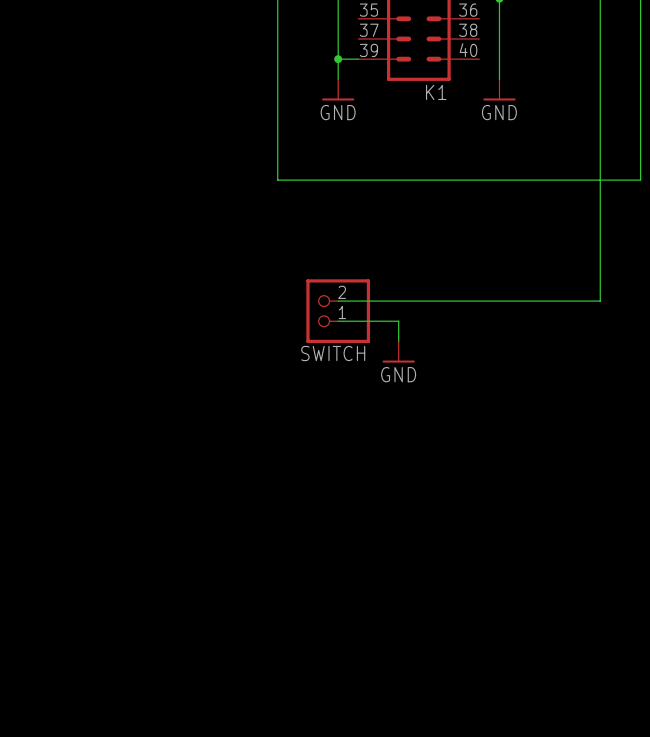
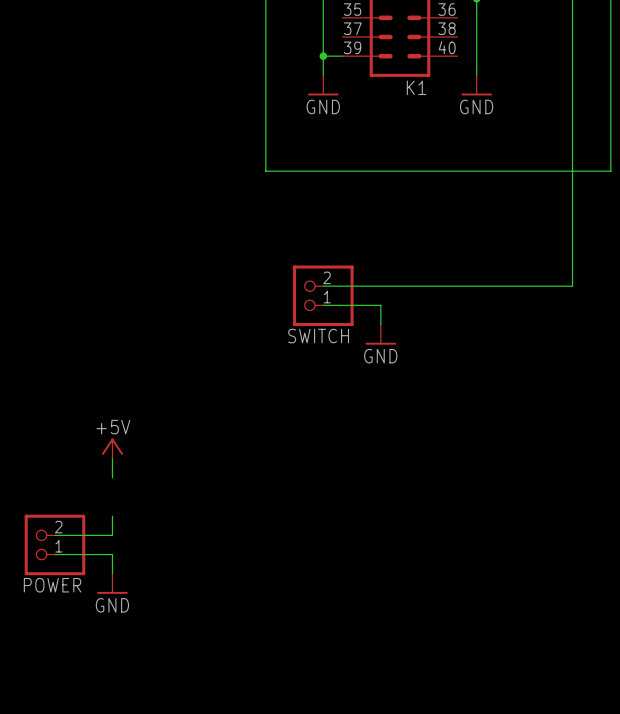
power symbol: none -> +5V (112, 448)
wire: none -> (112, 458) (112, 477)
wire: none -> (112, 516) (112, 535) (54, 535)
POWER: none -> (54, 544)
wire: none -> (54, 554) (112, 554) (112, 573)
power symbol: none -> GND (112, 583)

